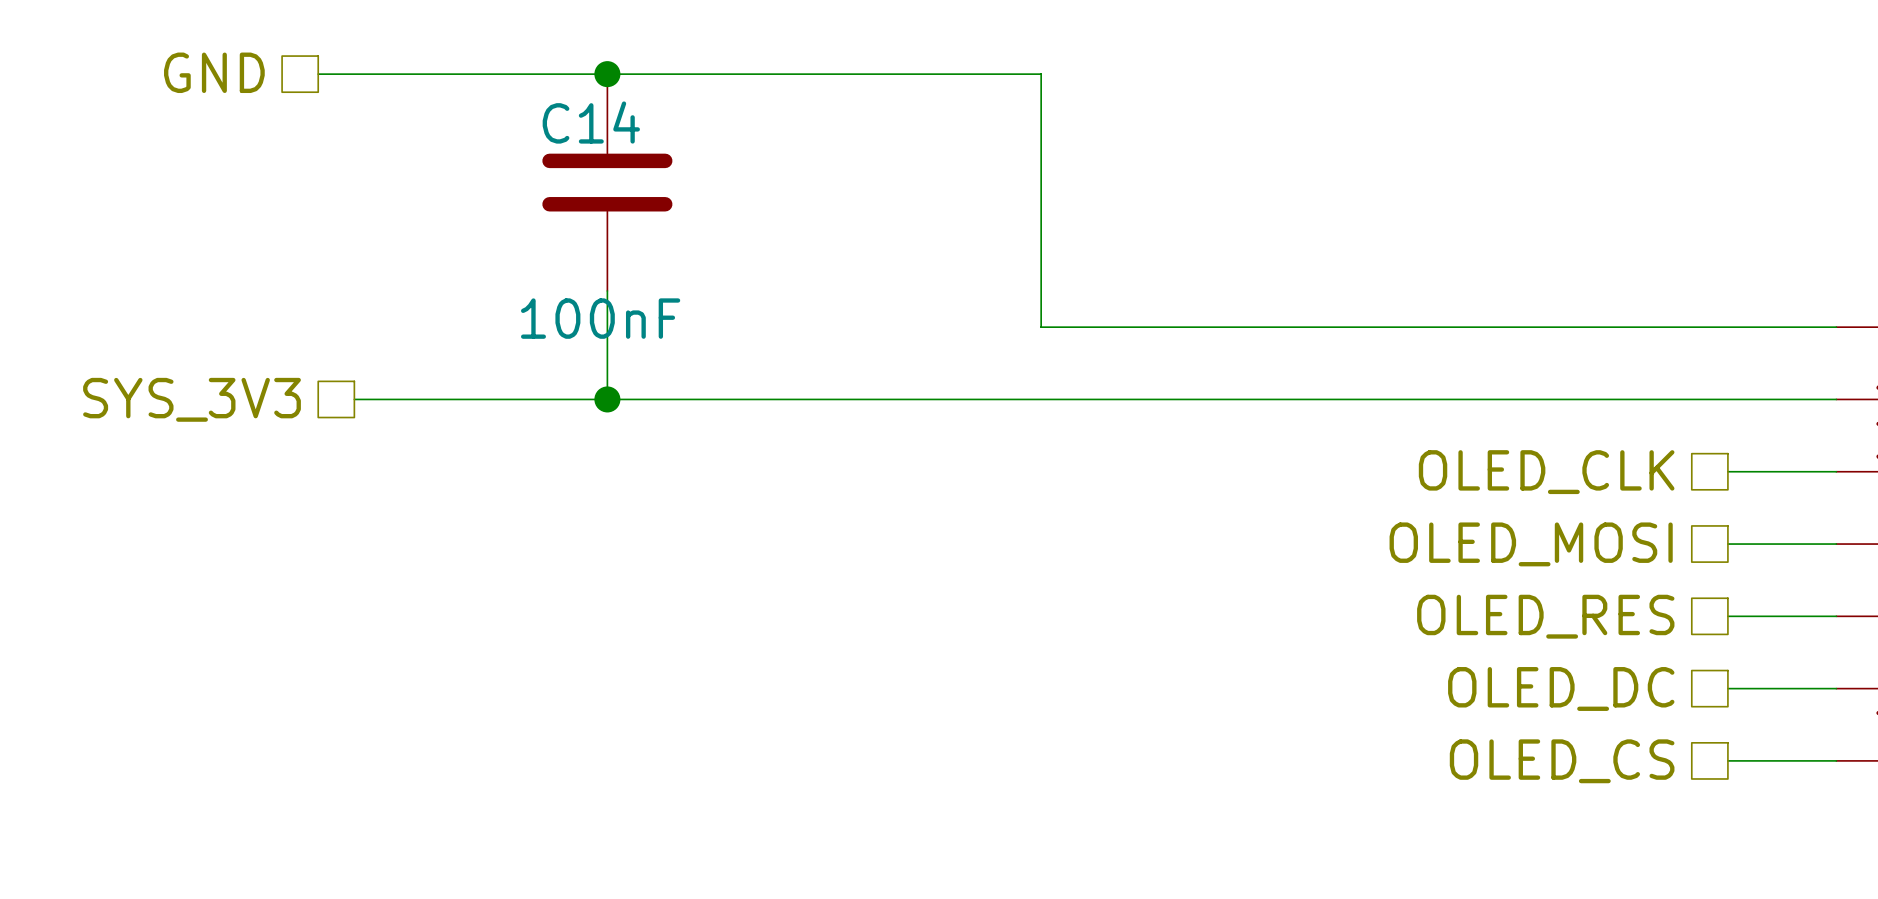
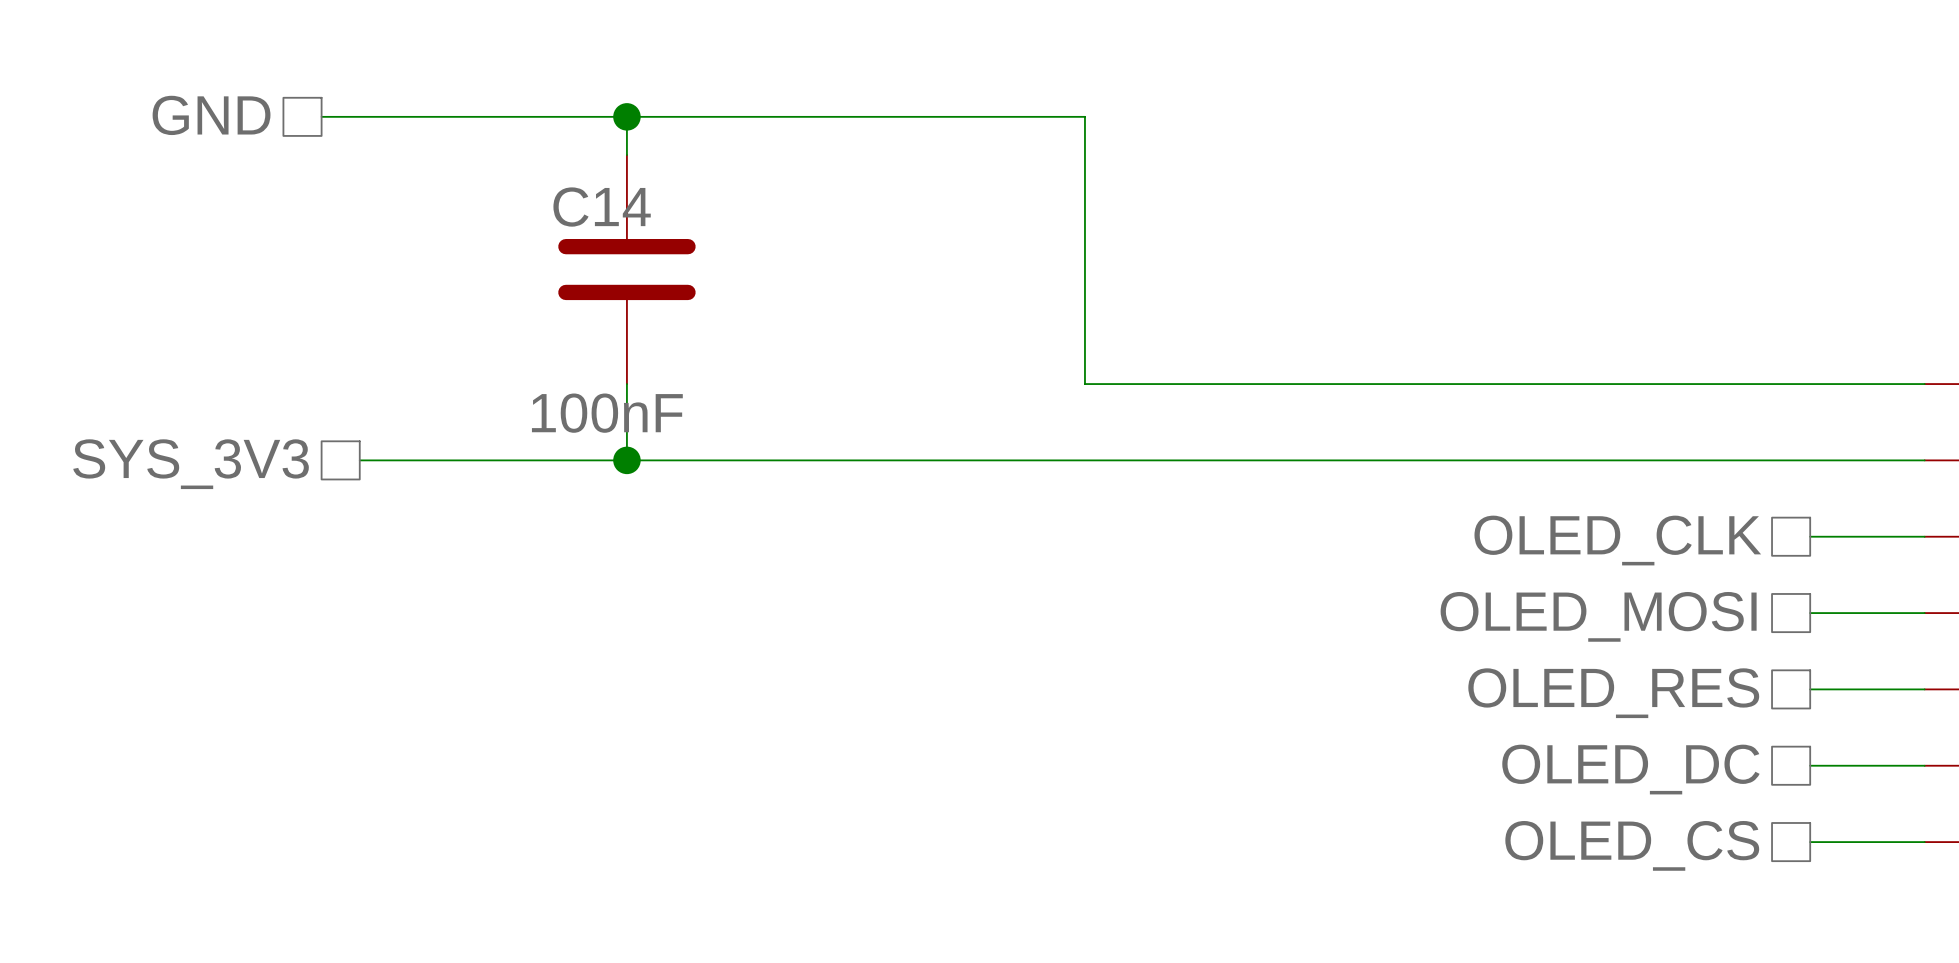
C14 position: (607, 182) -> (626, 269)

